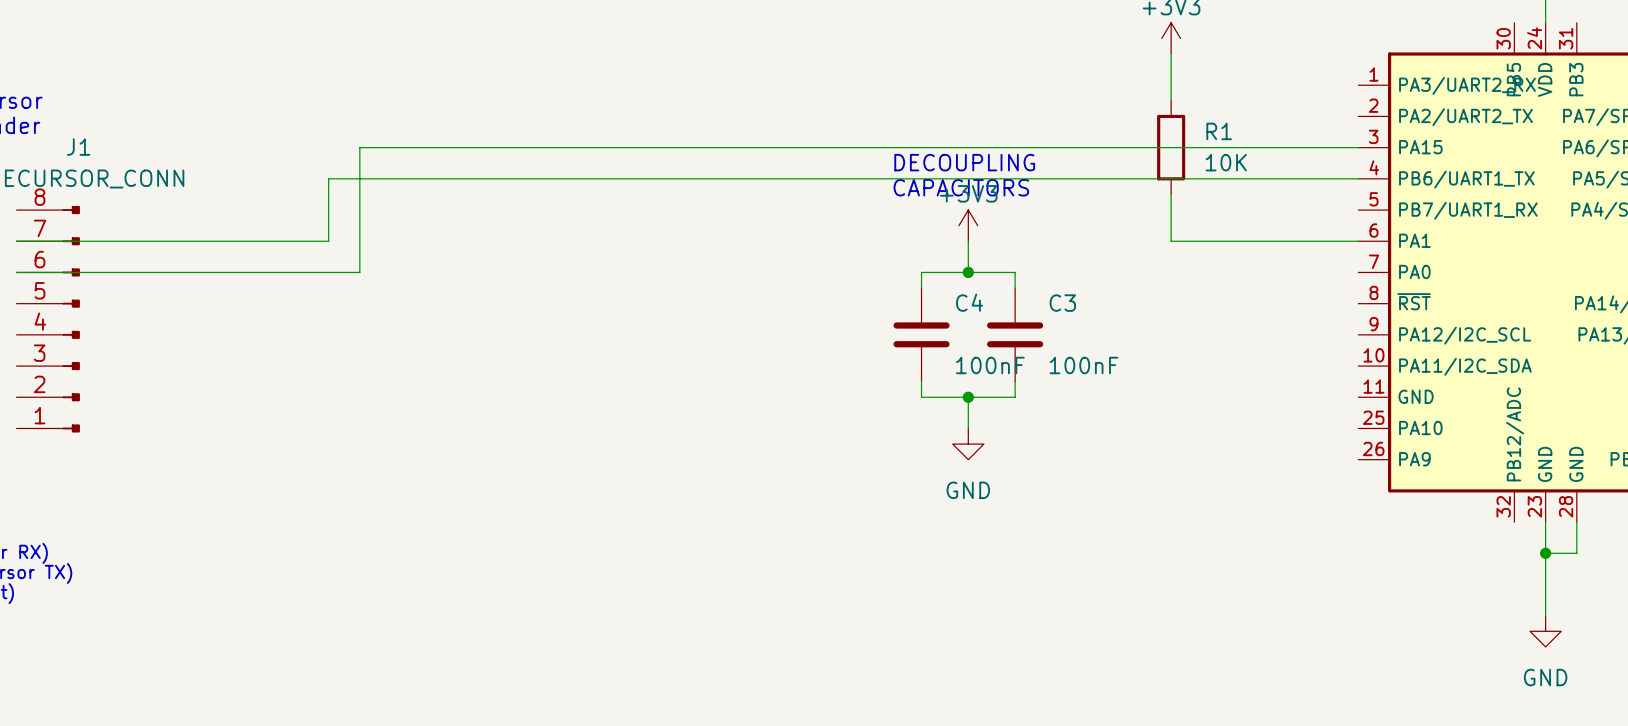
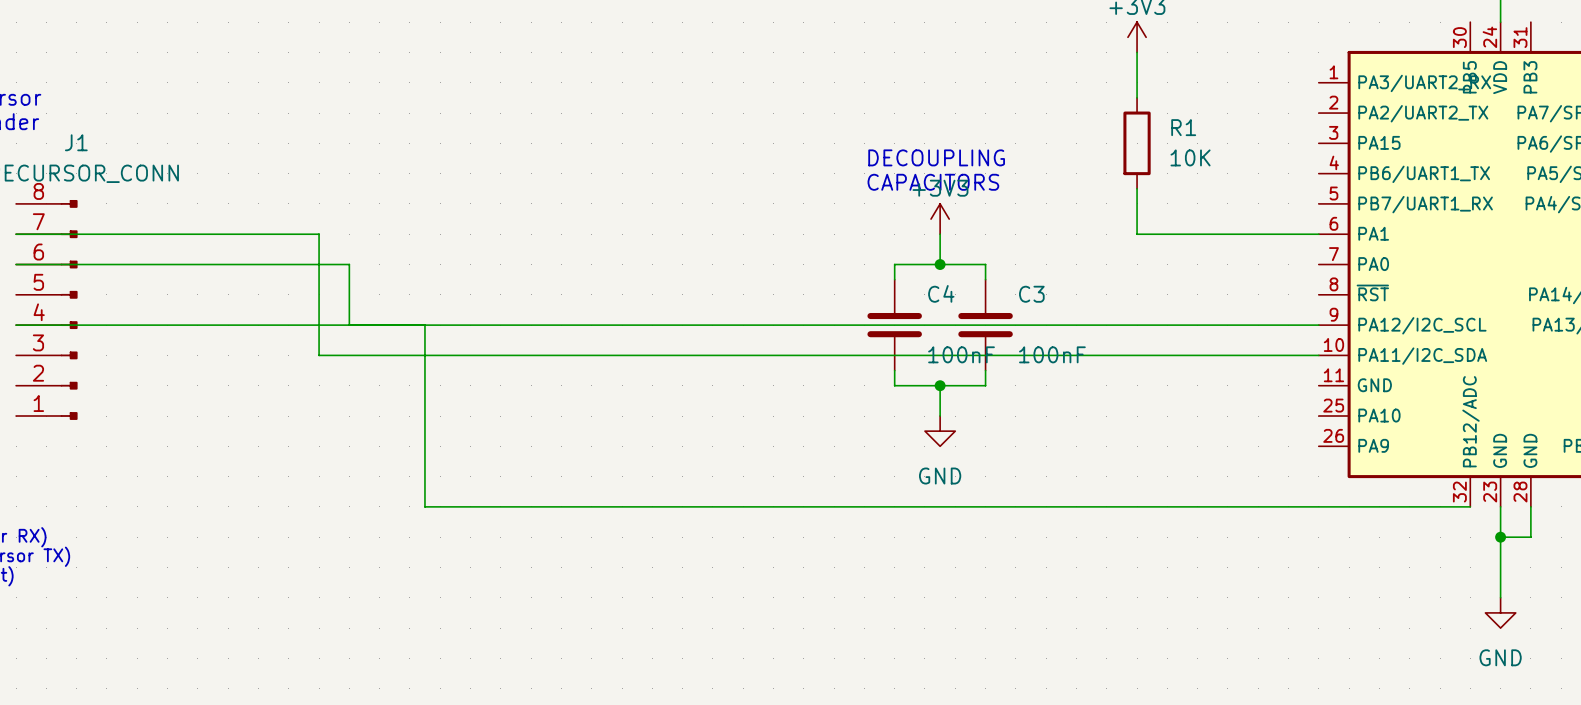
wire: (1358, 147) (359, 147) (359, 272) -> (349, 325) (349, 264)
wire: (1358, 178) (328, 178) (328, 241) -> (1318, 355) (319, 355) (319, 234)
wire: none -> (16, 325) (1318, 325)
wire: none -> (424, 325) (424, 506) (1470, 506)

